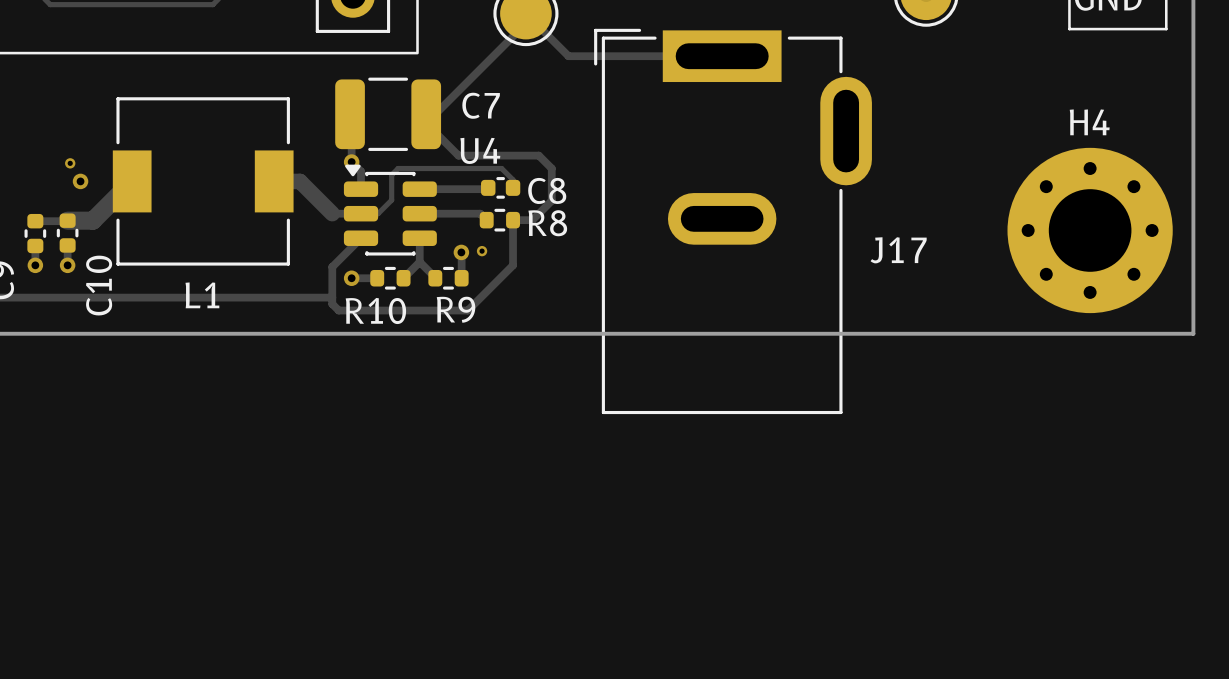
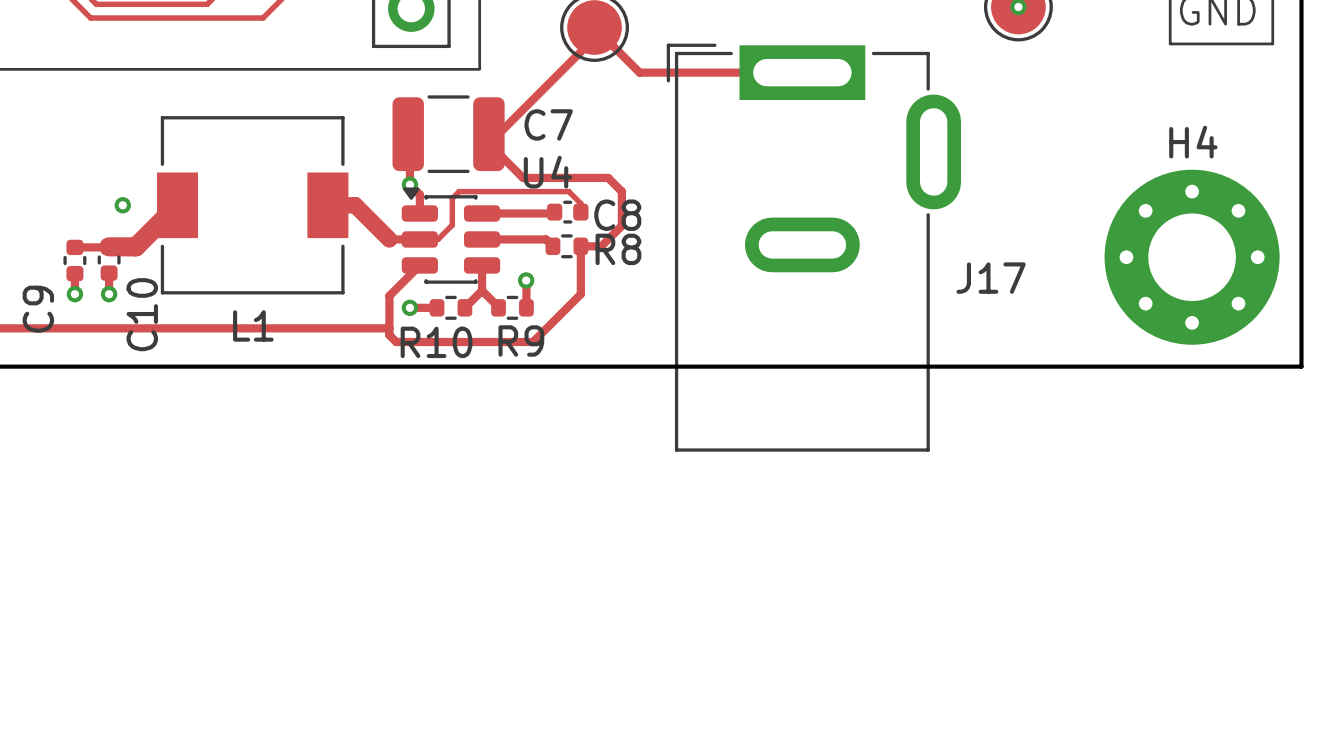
via: (70, 163) -> none
via: (482, 251) -> none

